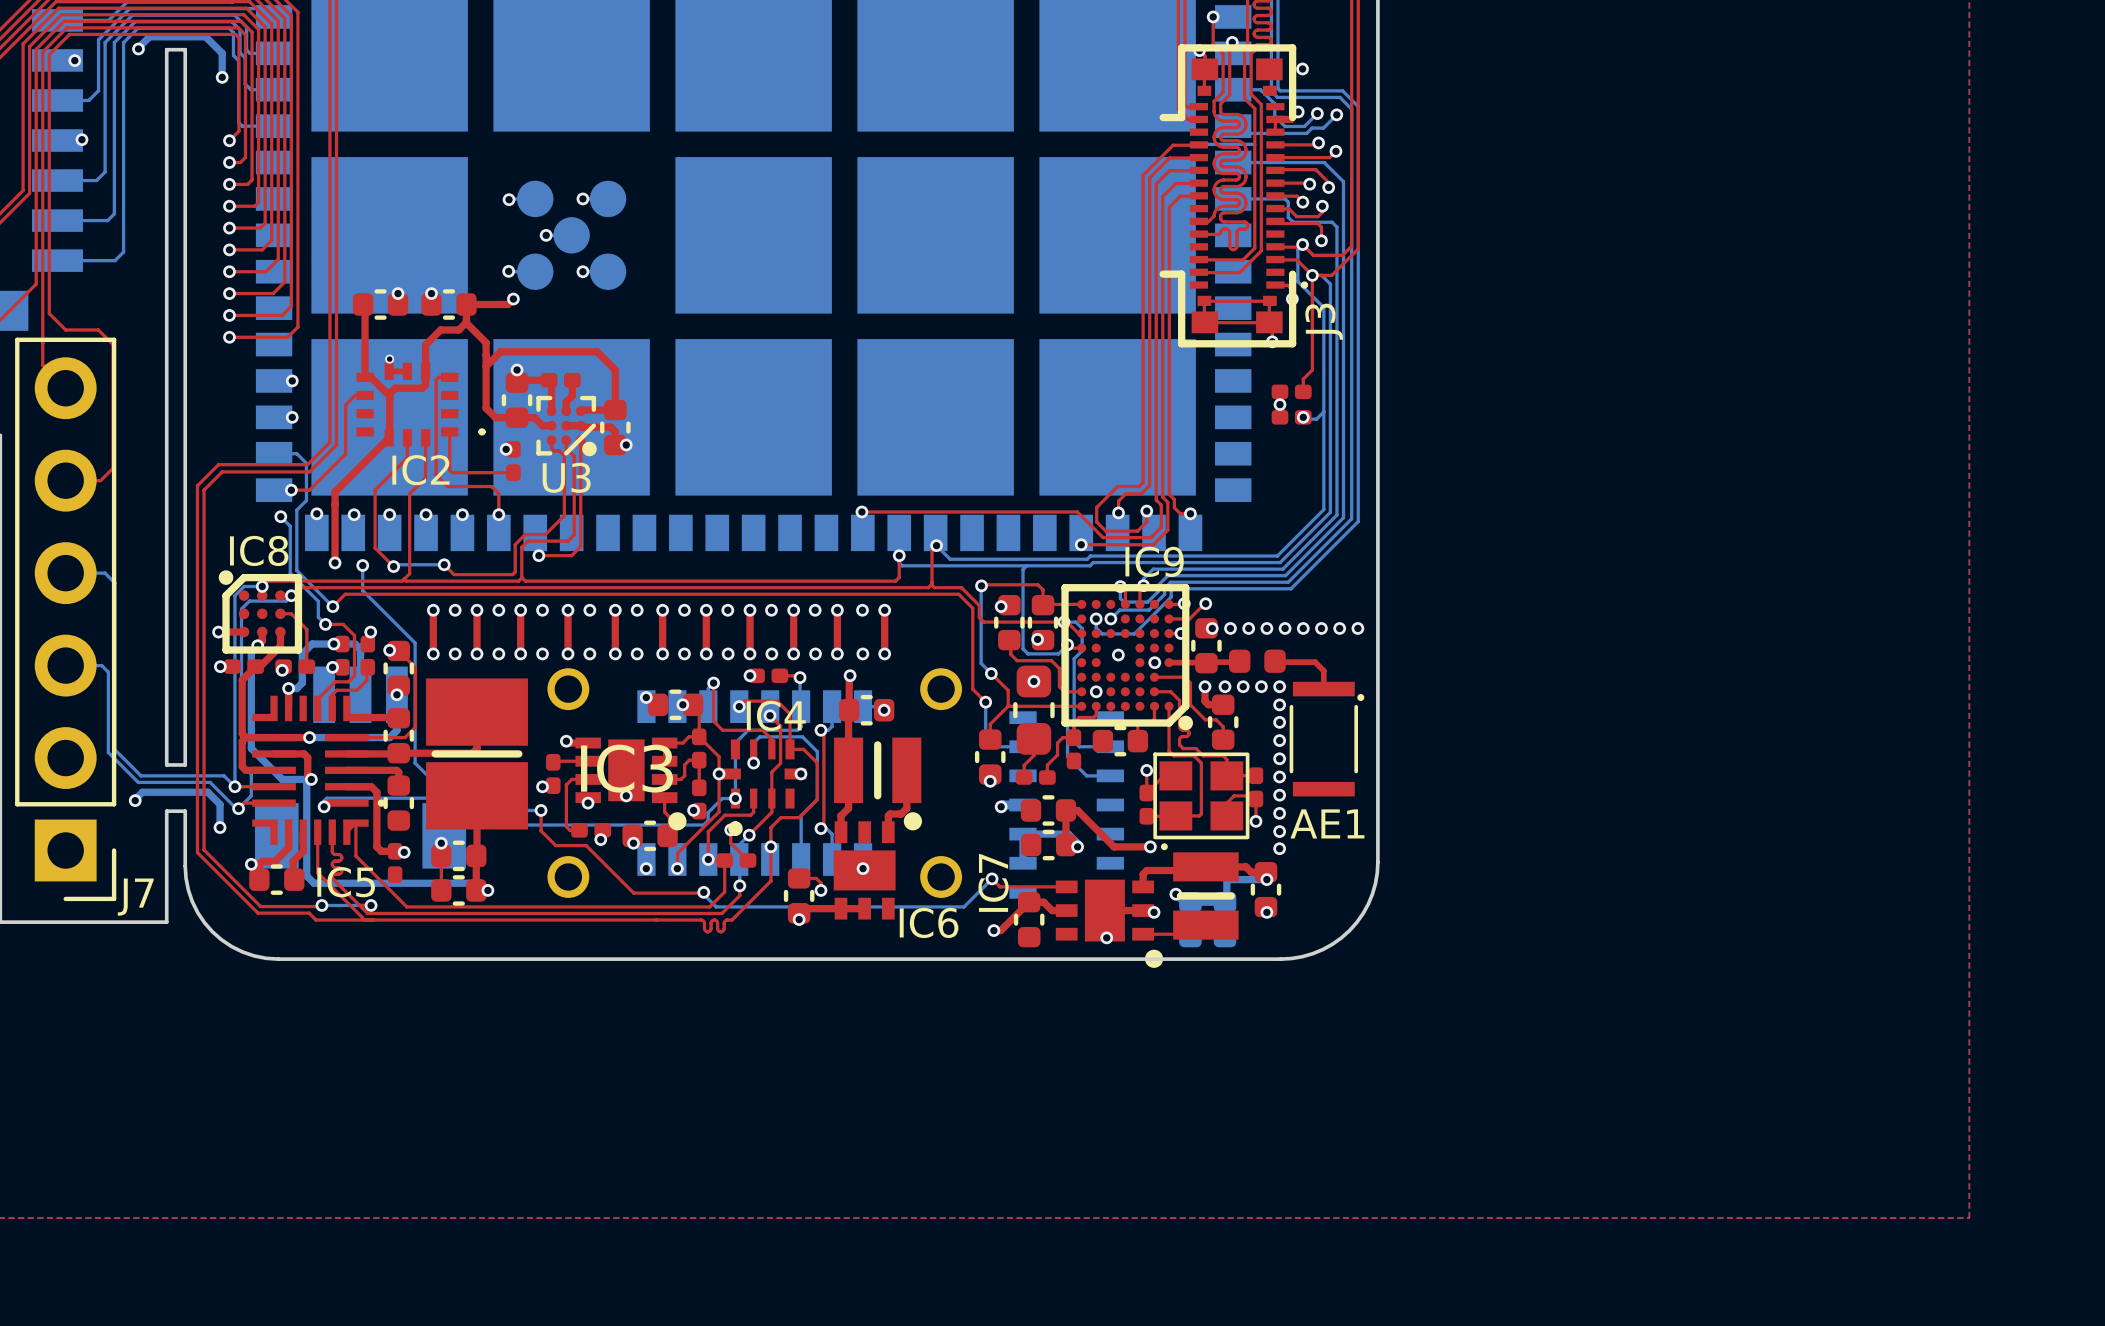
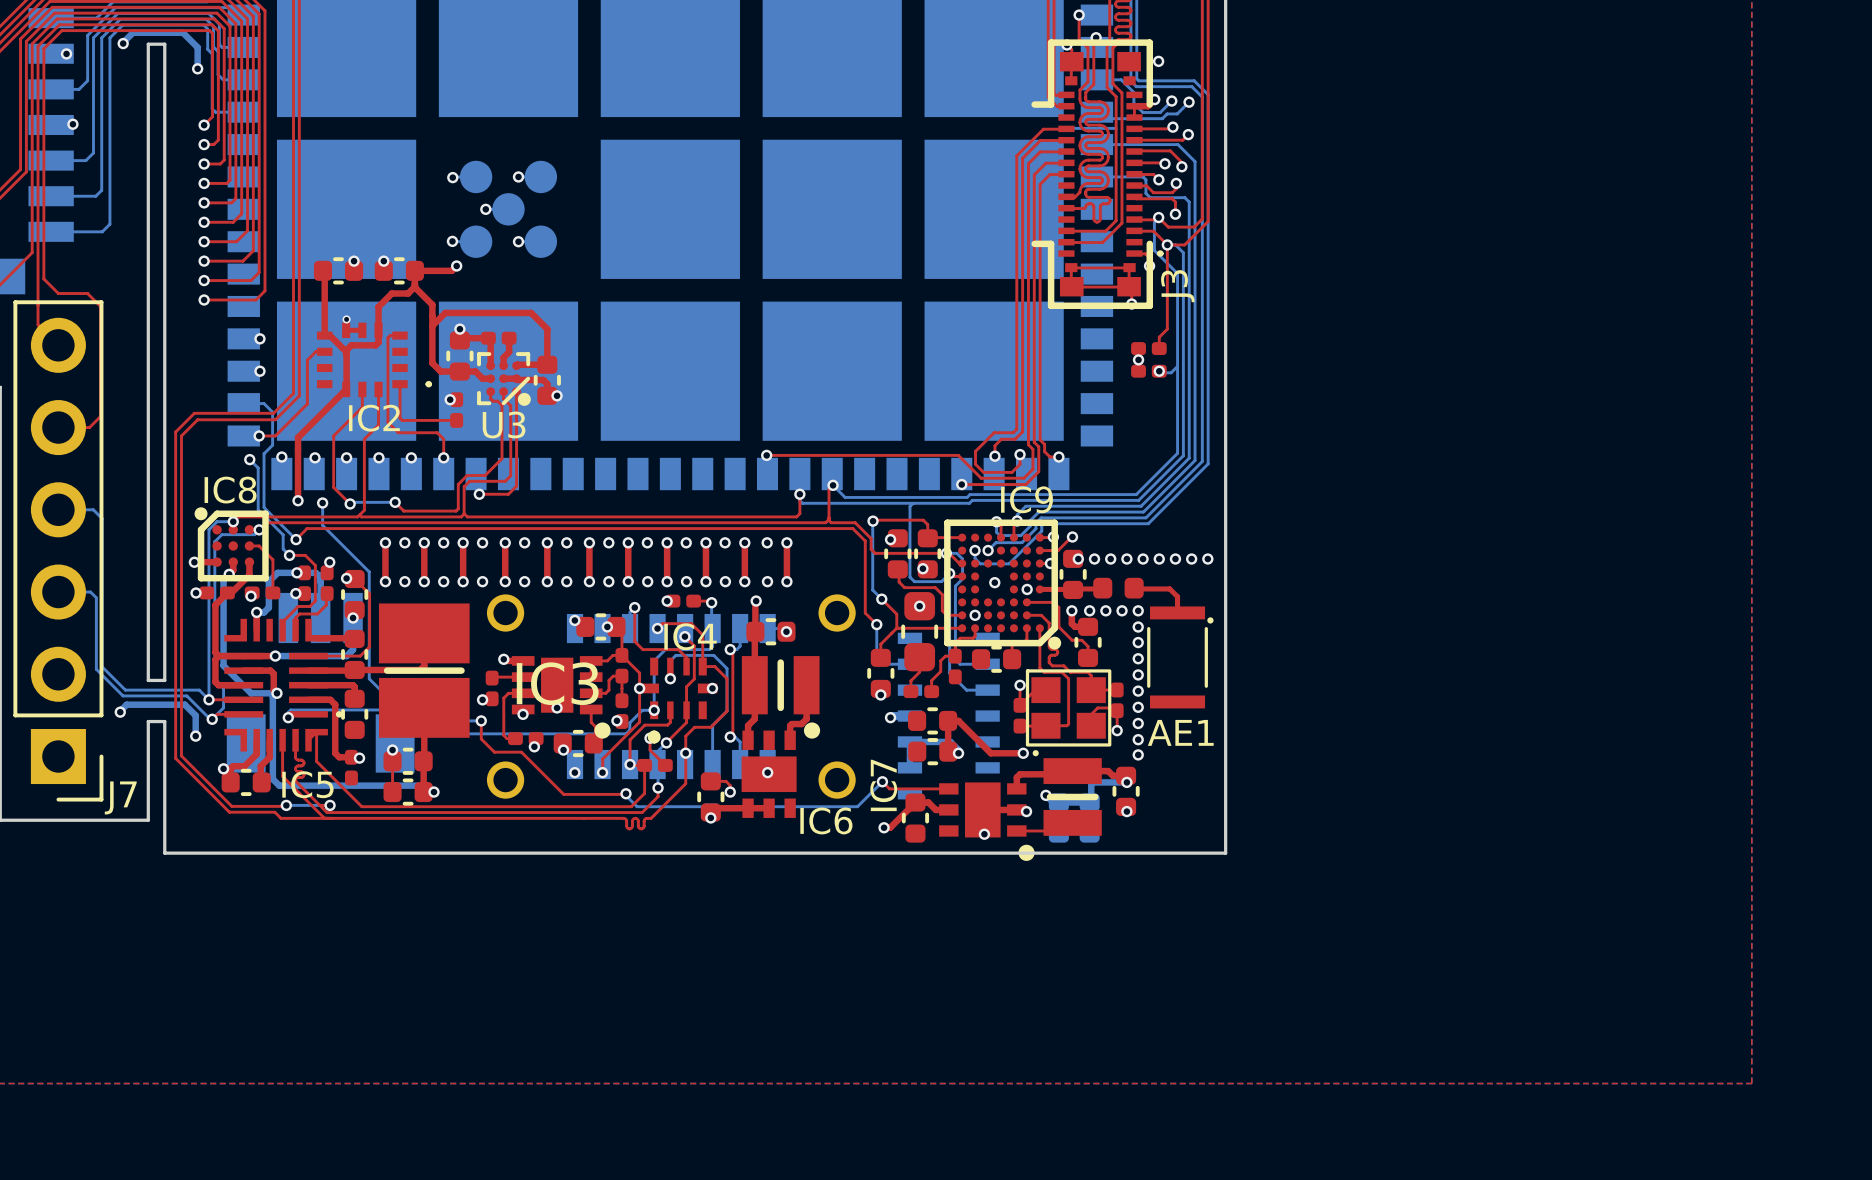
board edge: (1377, 862) (1372, 894) (1363, 913) (1349, 930) (1322, 949) (1302, 956) (1280, 959) -> (1225, 766) (1225, 853) (1139, 853)
board edge: (185, 866) (186, 878) (192, 901) (204, 922) (212, 931) (221, 939) (242, 952) (266, 958) (278, 959) -> (164, 770) (164, 853) (247, 853)

